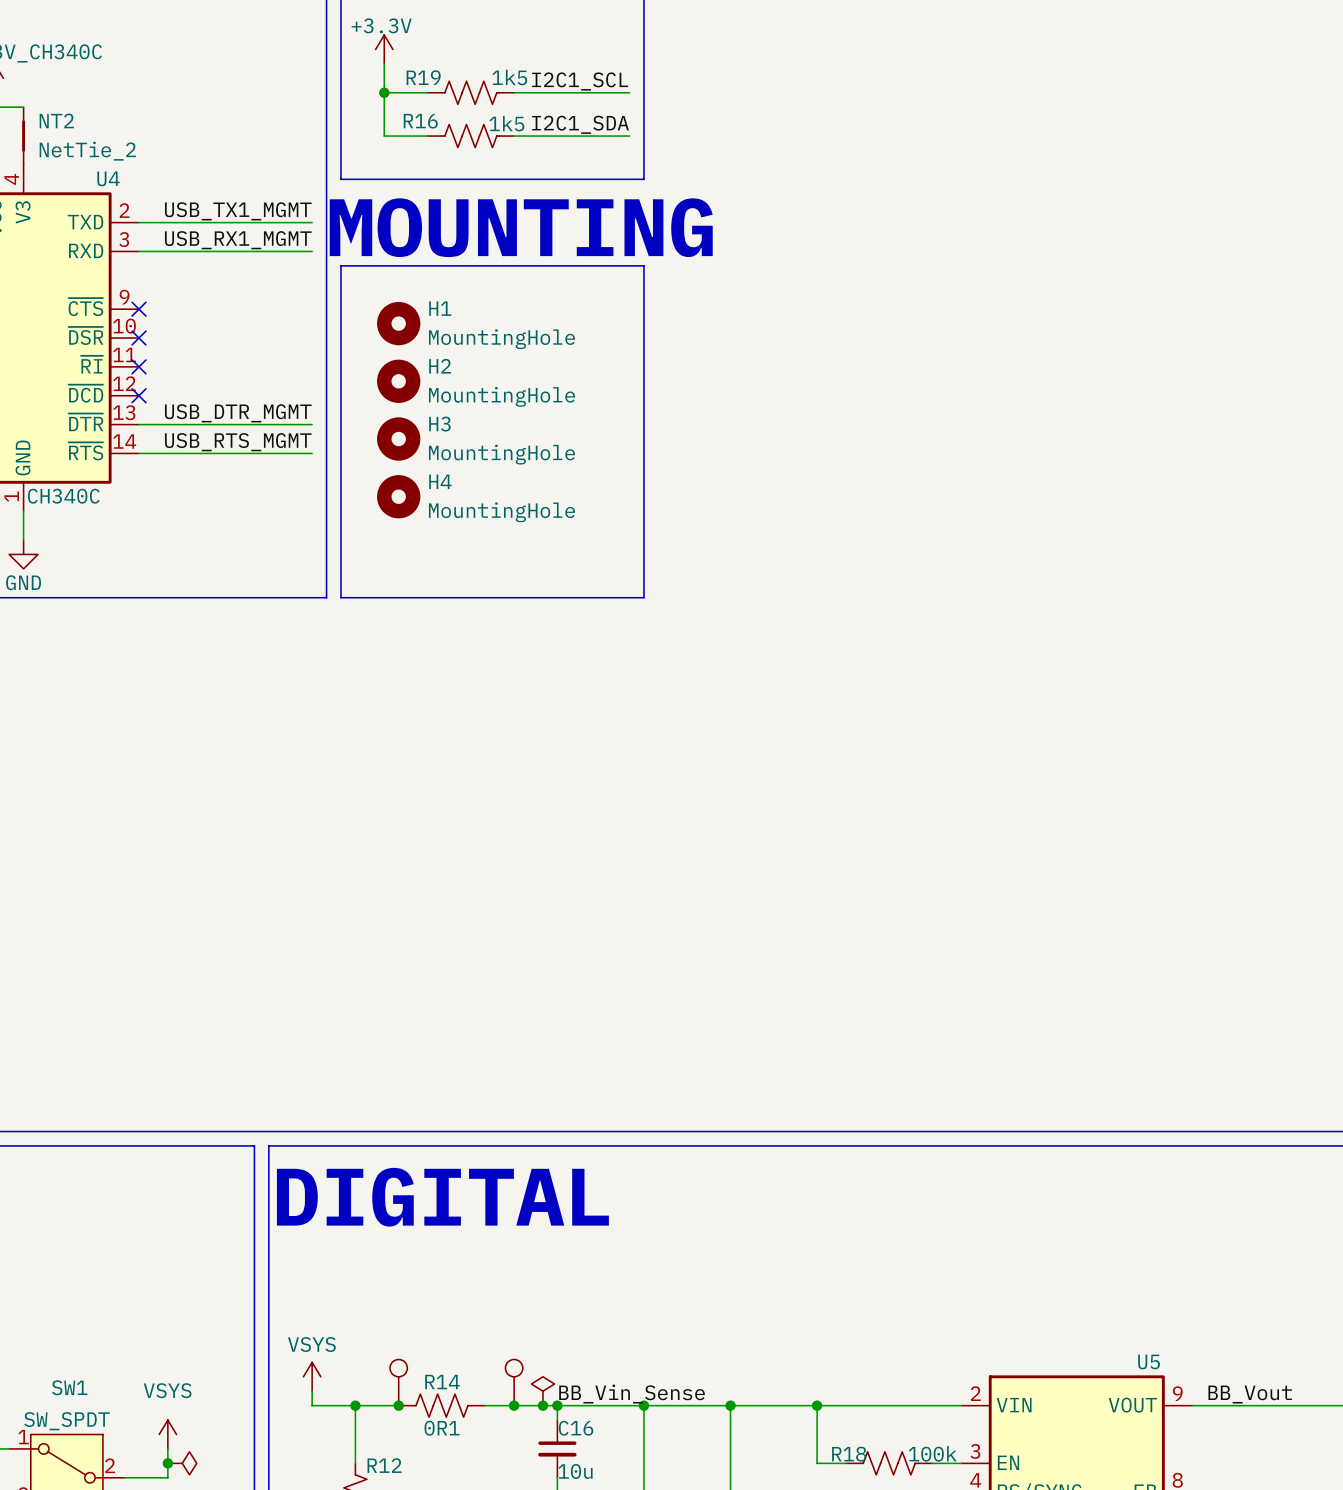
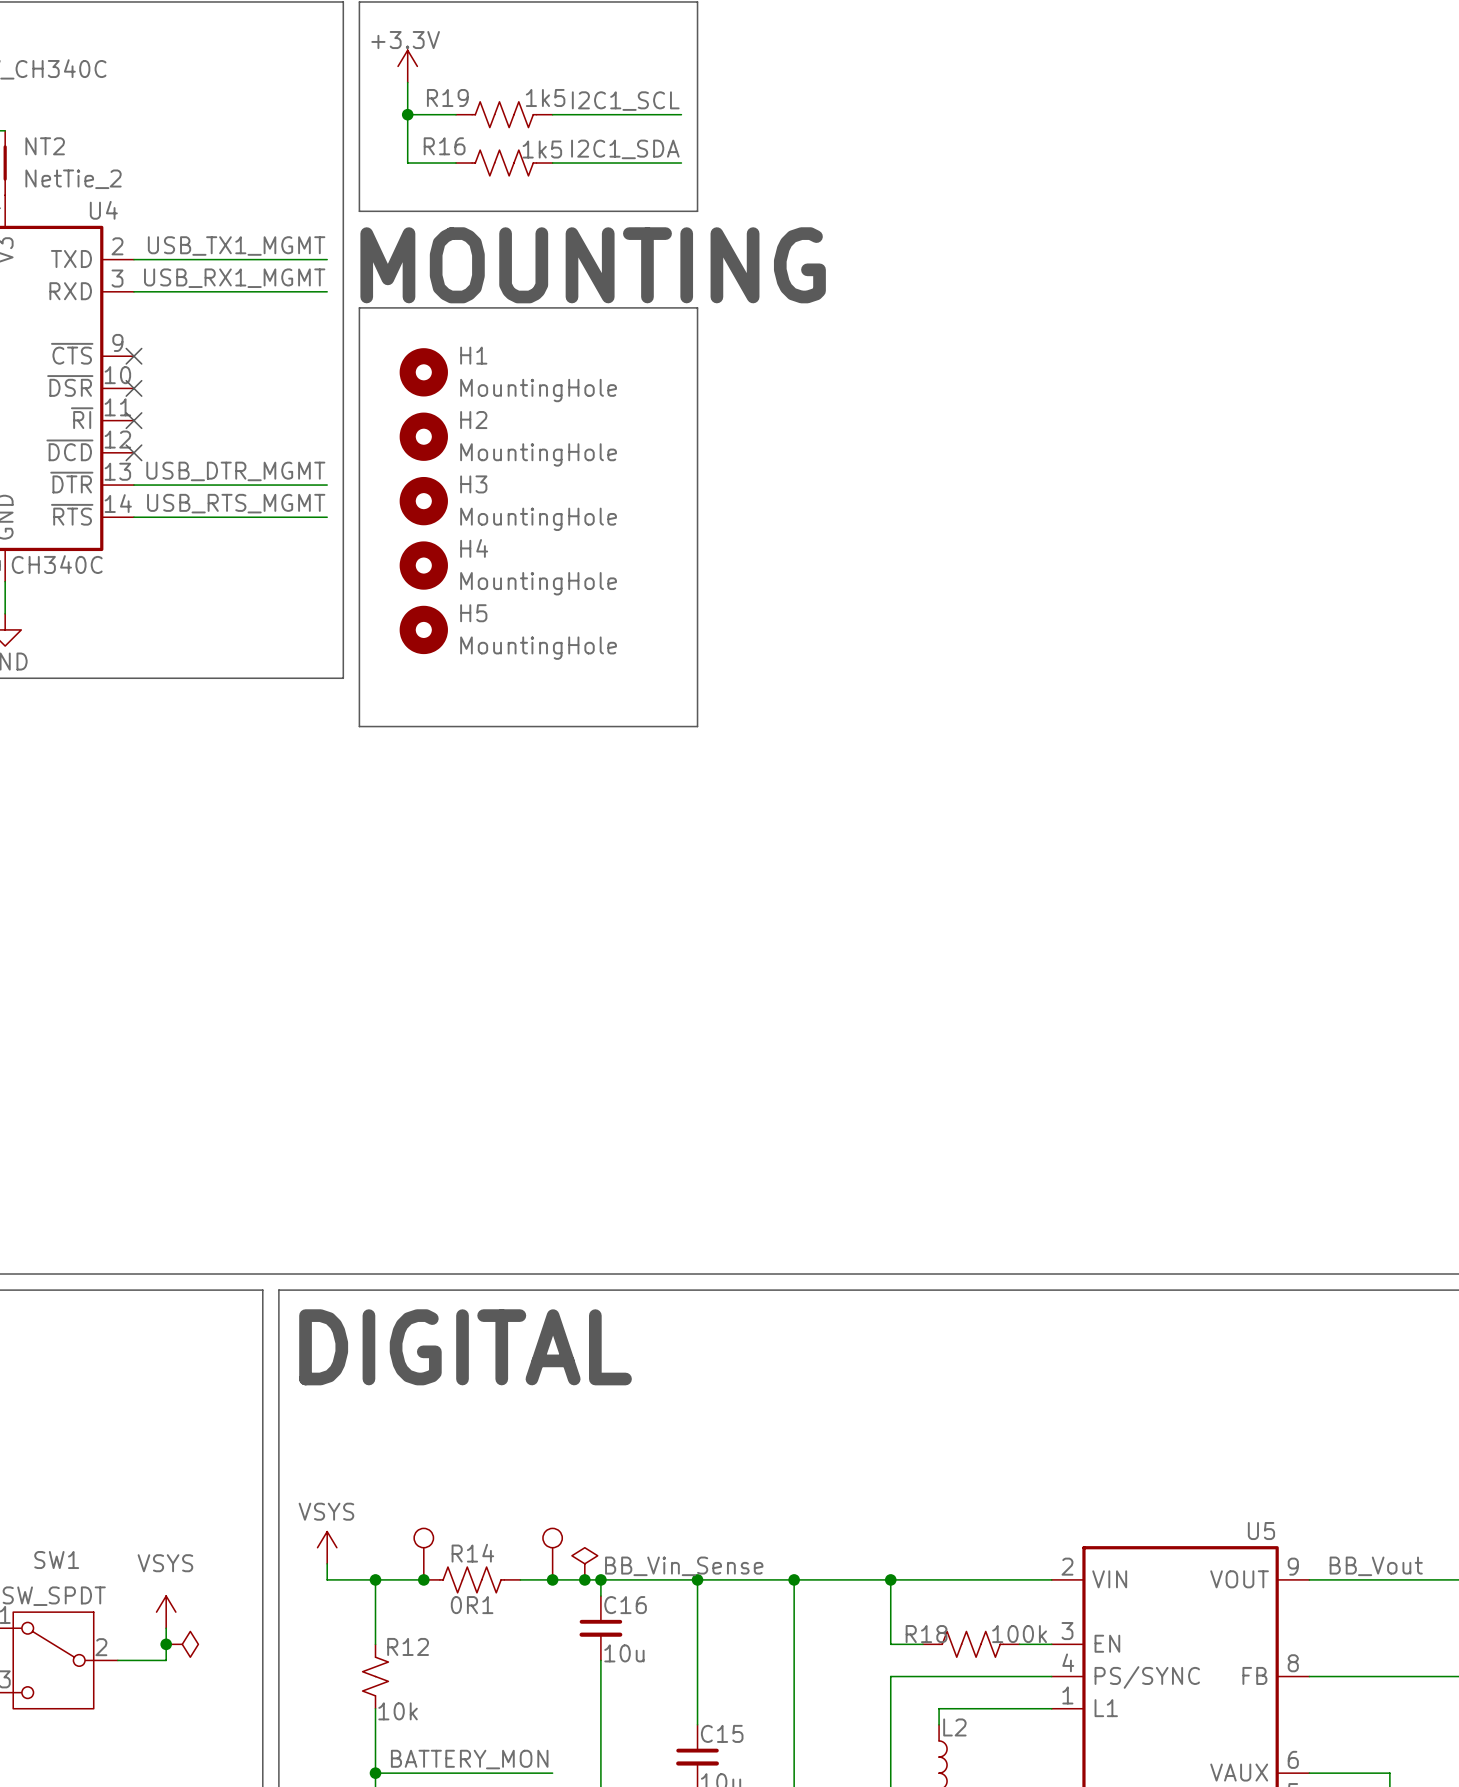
H5: none -> MountingHole (423, 629)
line: (340, 597) (643, 597) -> (359, 678) (359, 726) (697, 726) (697, 678)

